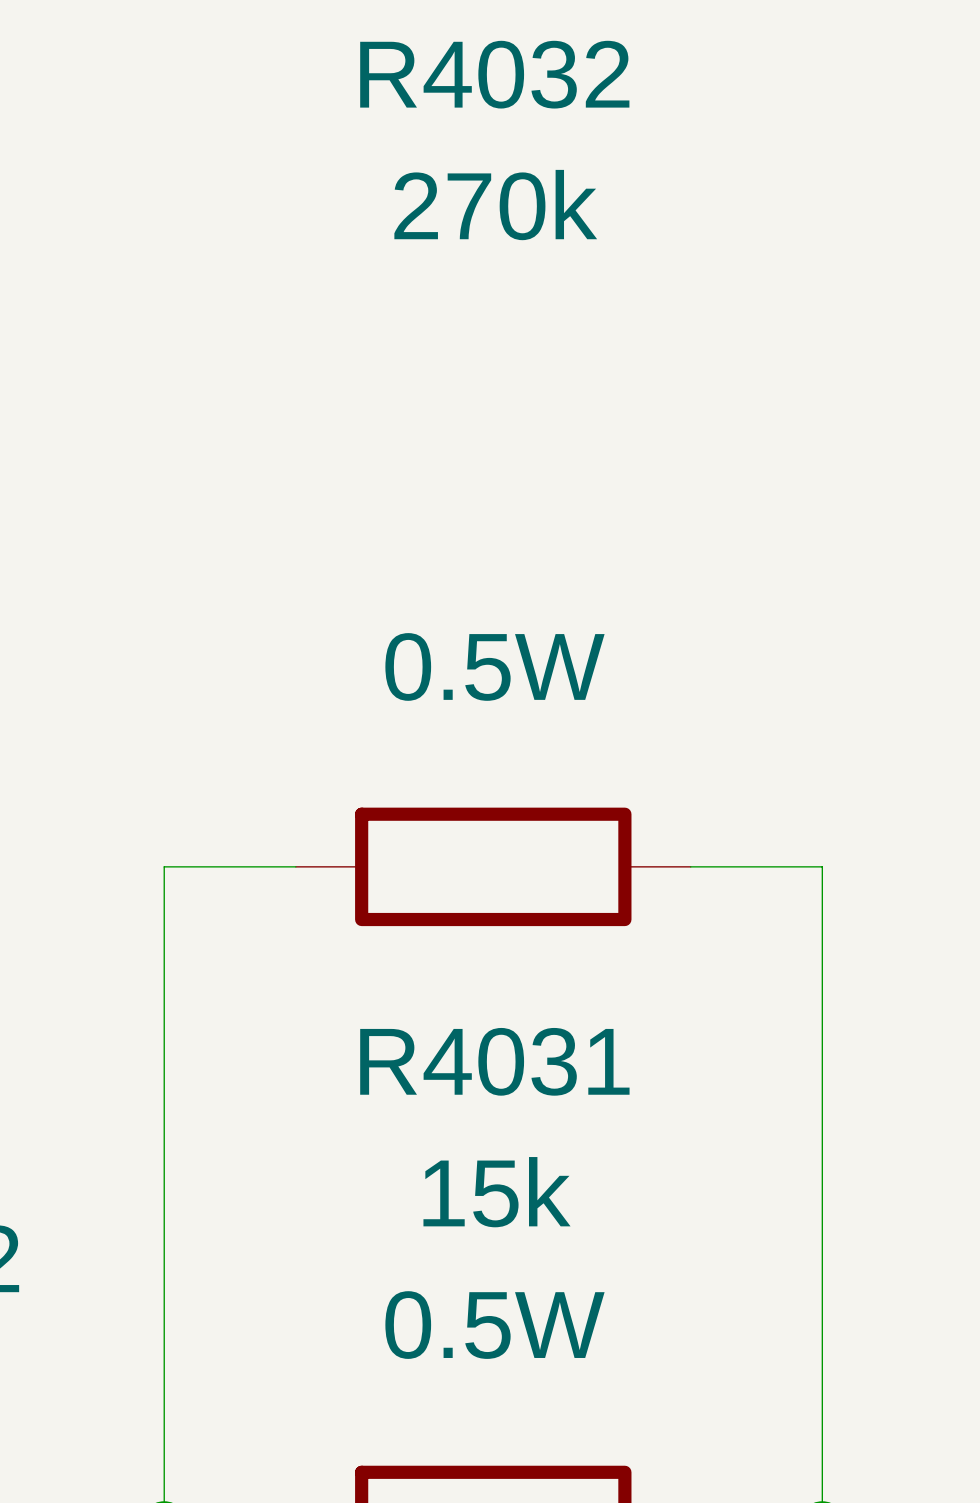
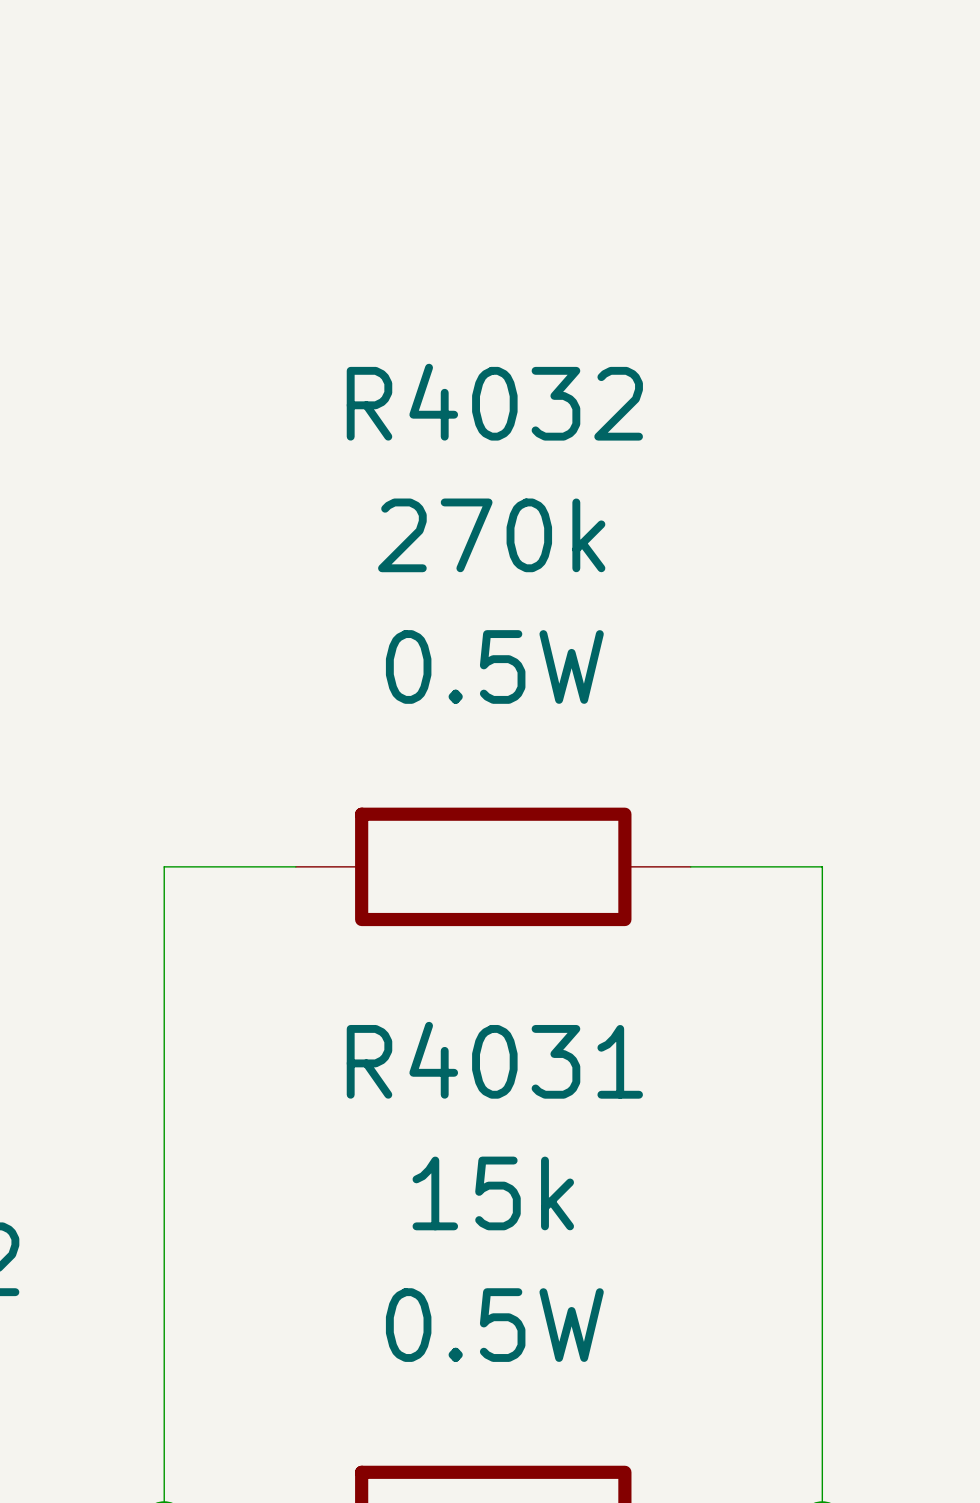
R4032 name position: R4032 (494, 74) -> R4032 (494, 402)
R4032 value position: 270k (495, 205) -> 270k (491, 535)

